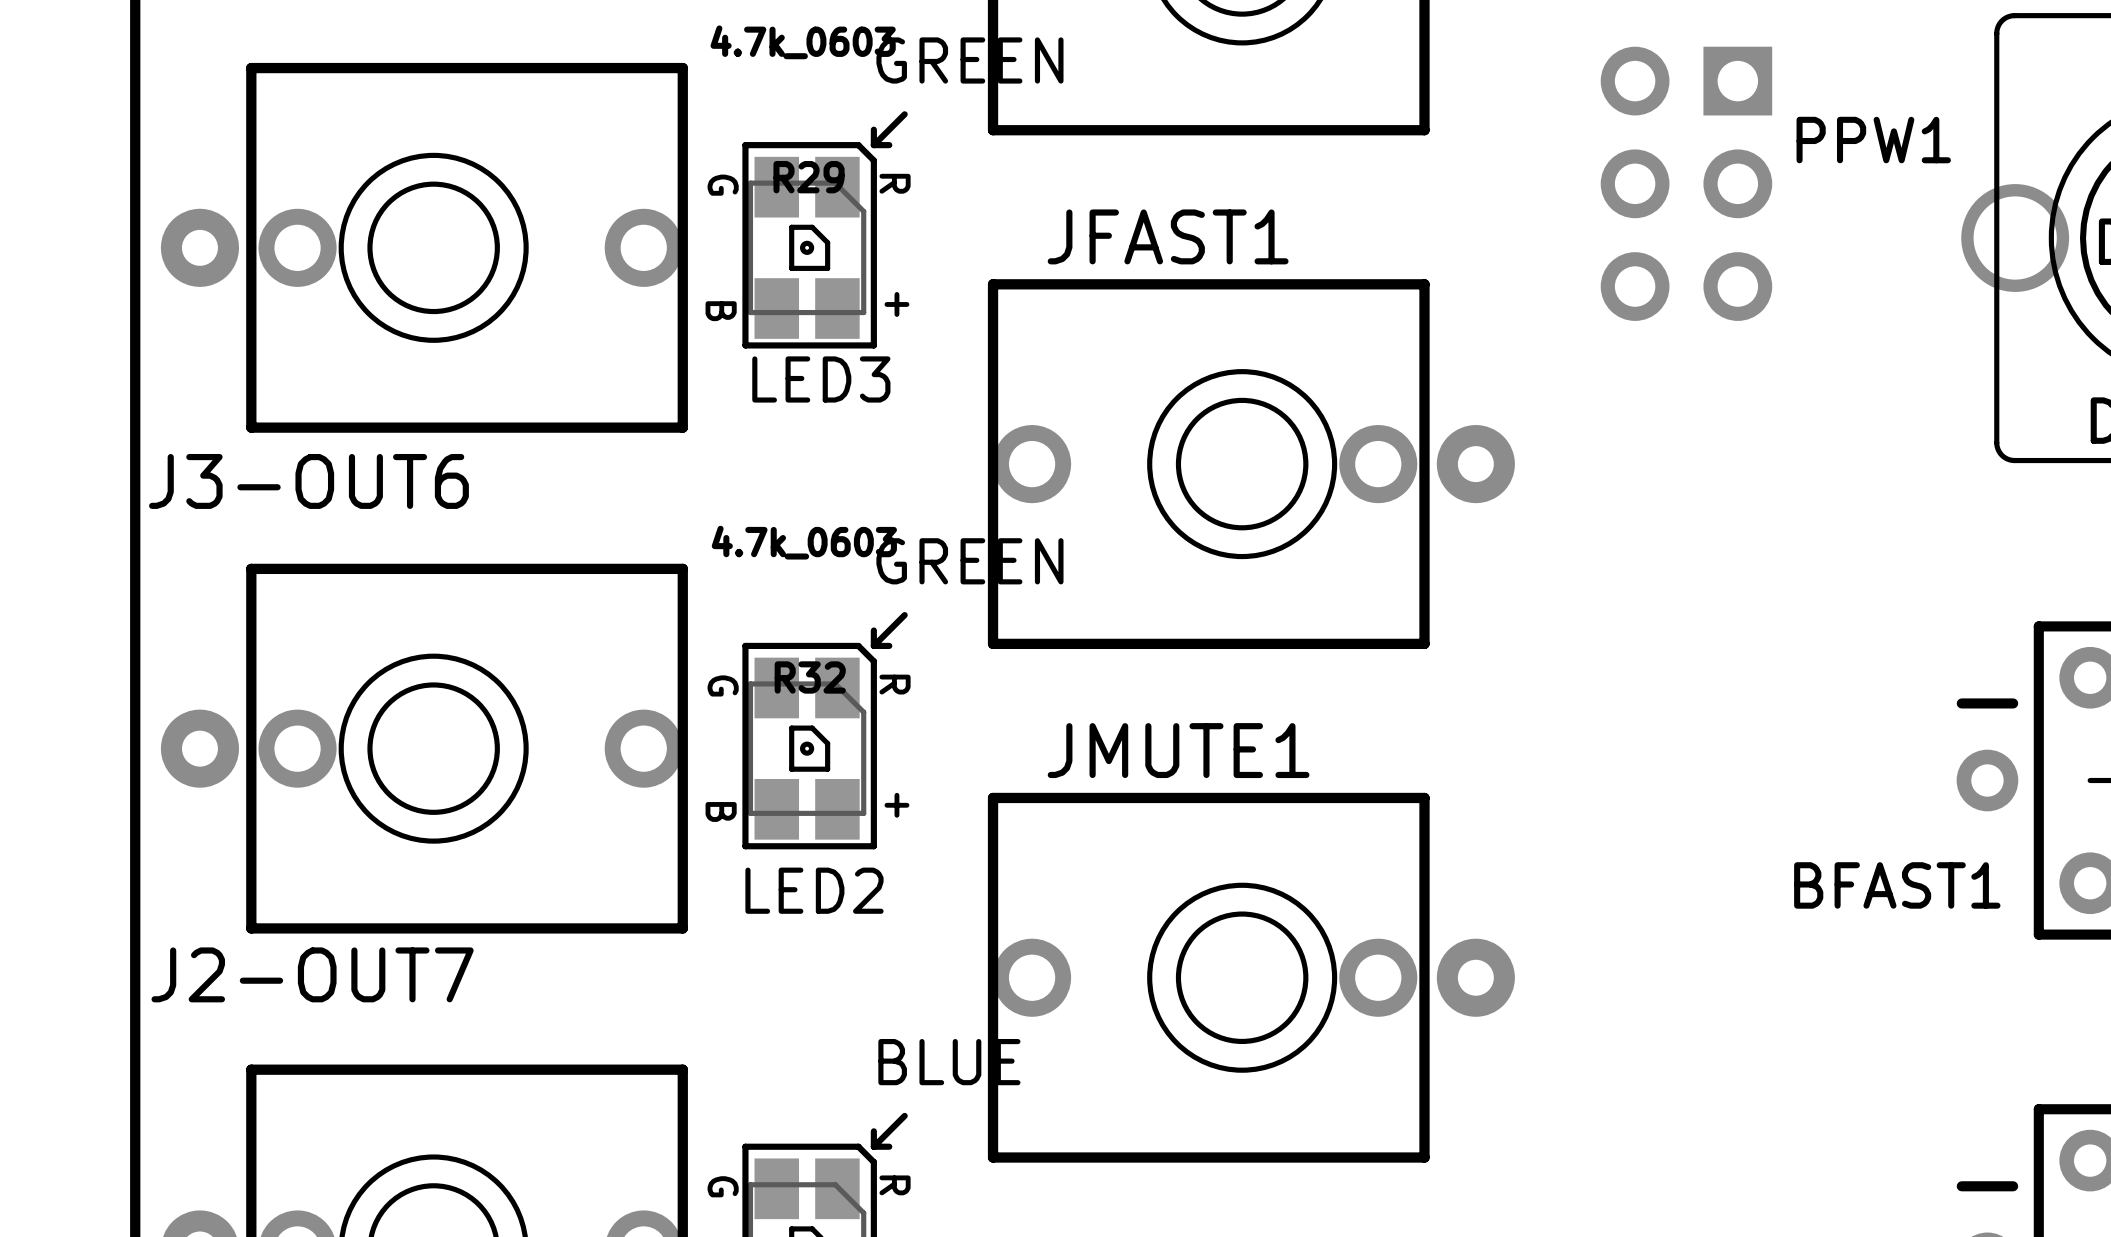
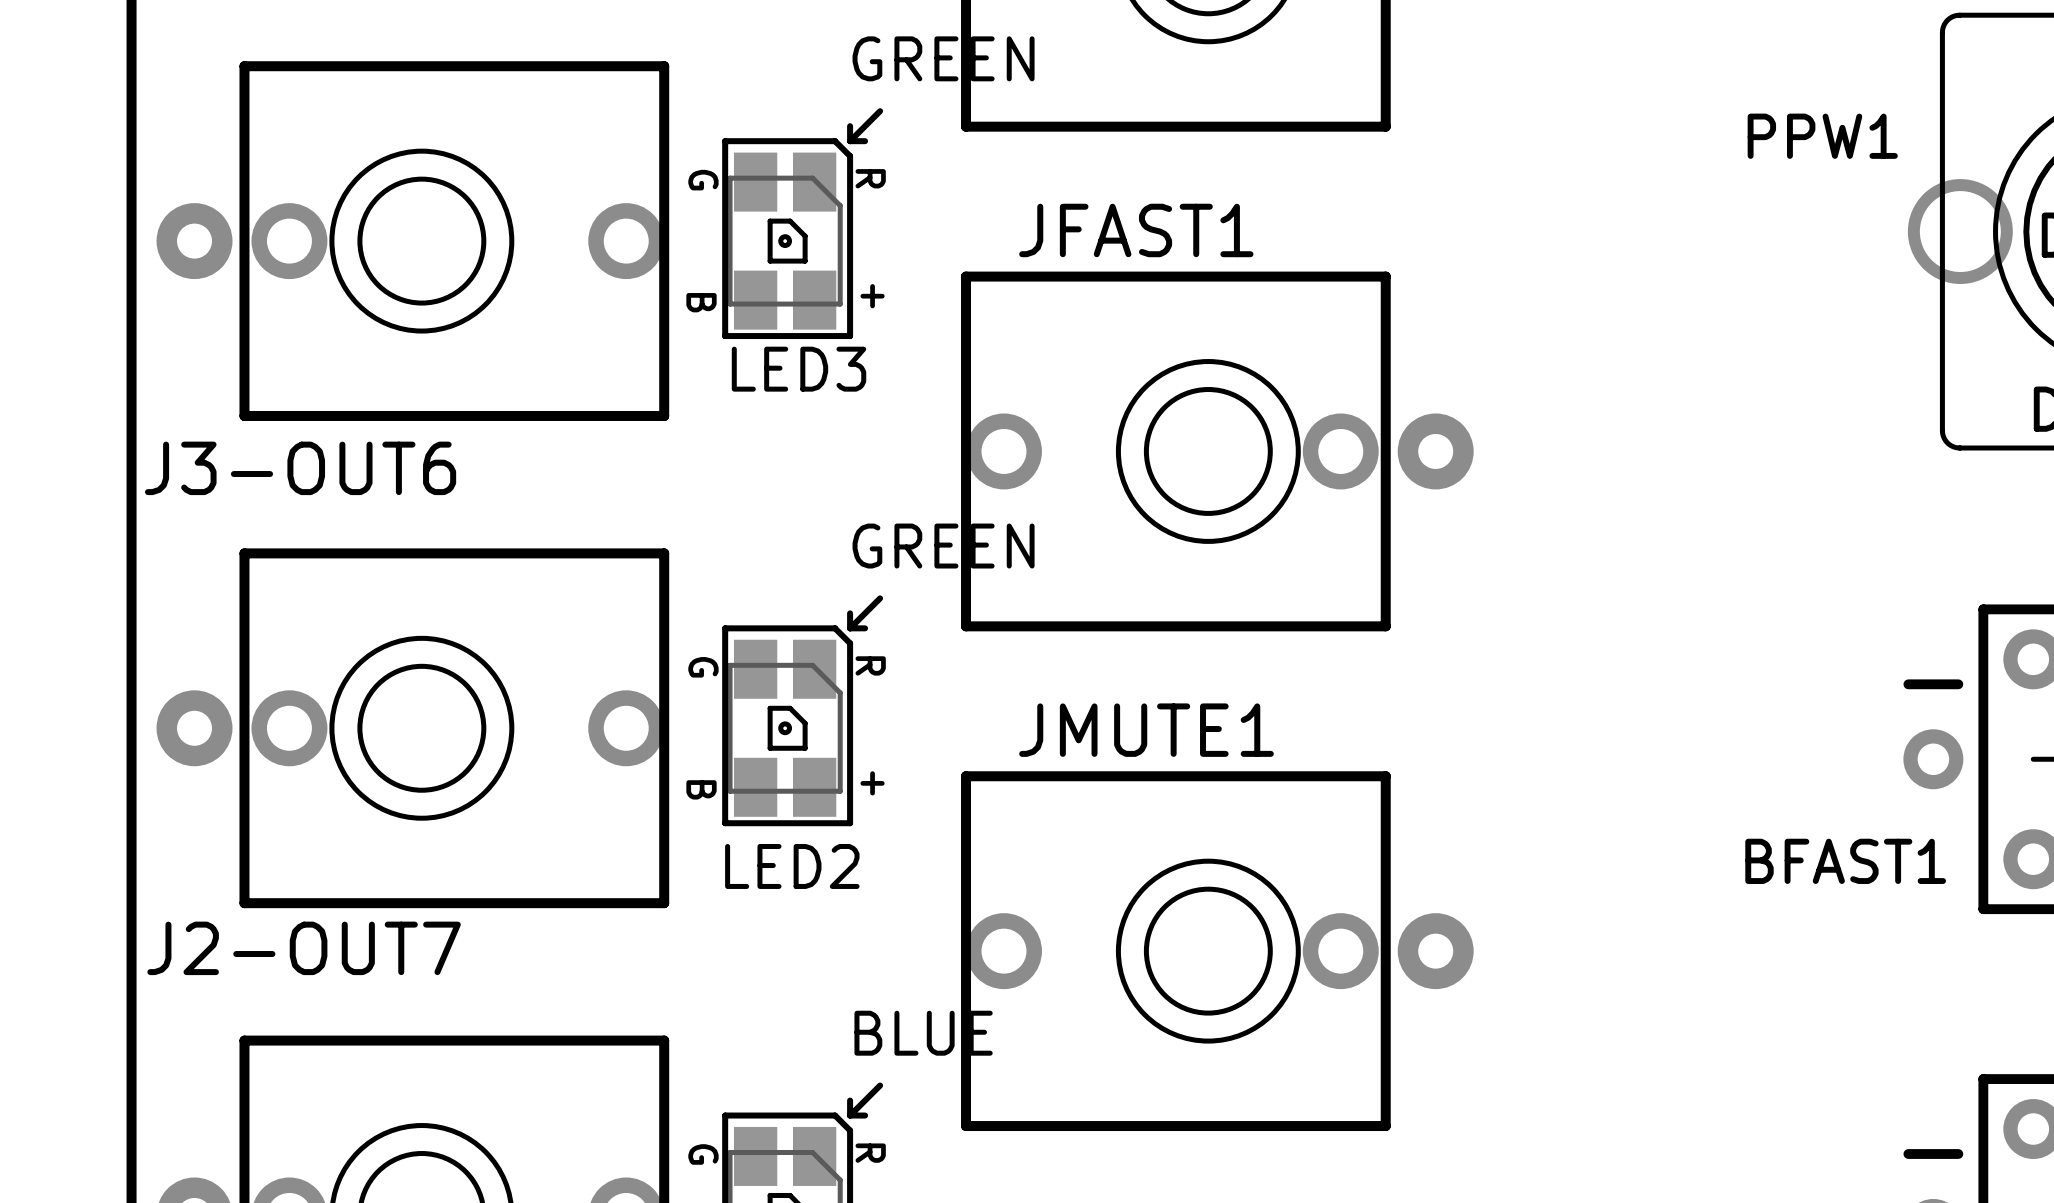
R29: 4.7k_0603 (803, 109) -> none
part: (1686, 183) -> none
R32: 4.7k_0603 (804, 609) -> none

